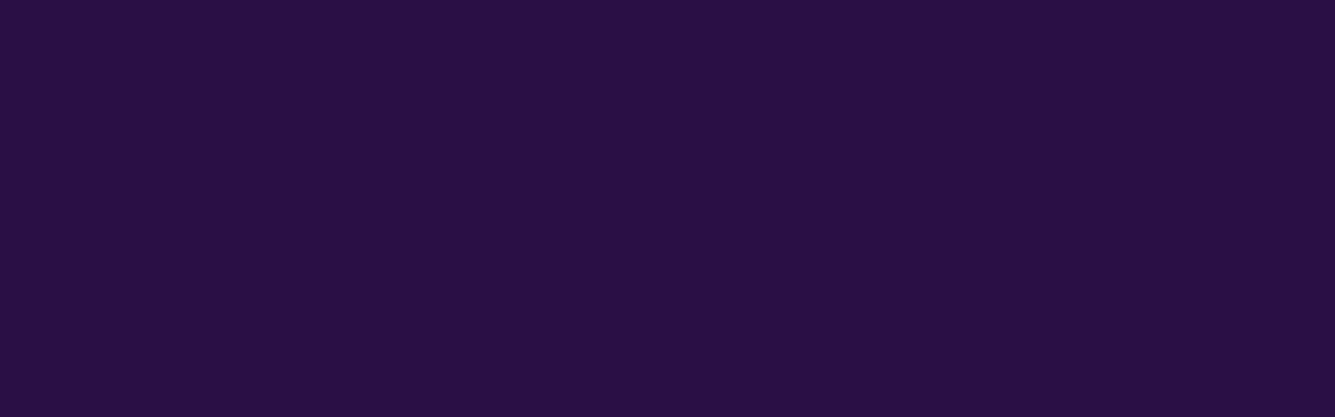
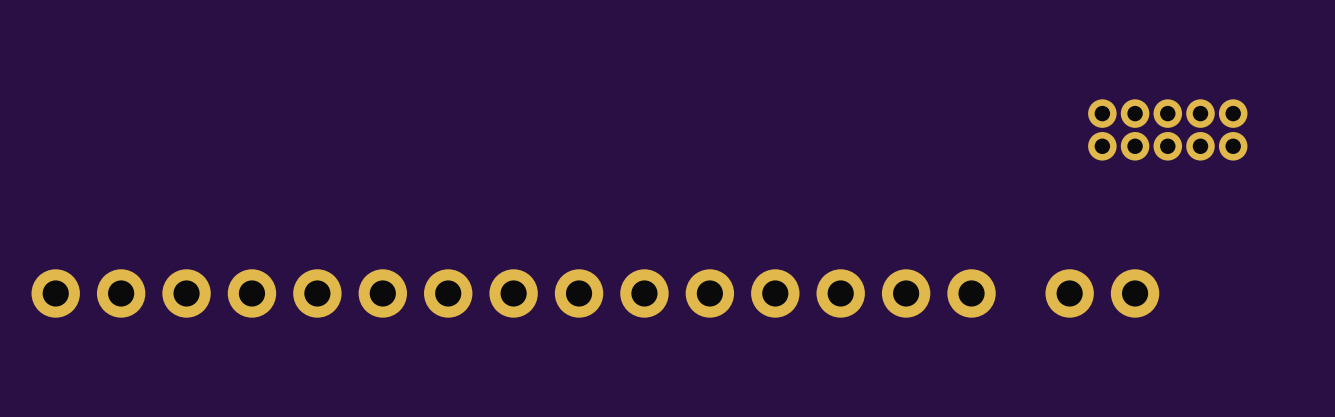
part: none -> (1167, 129)
part: none -> (513, 293)
part: none -> (1102, 293)

